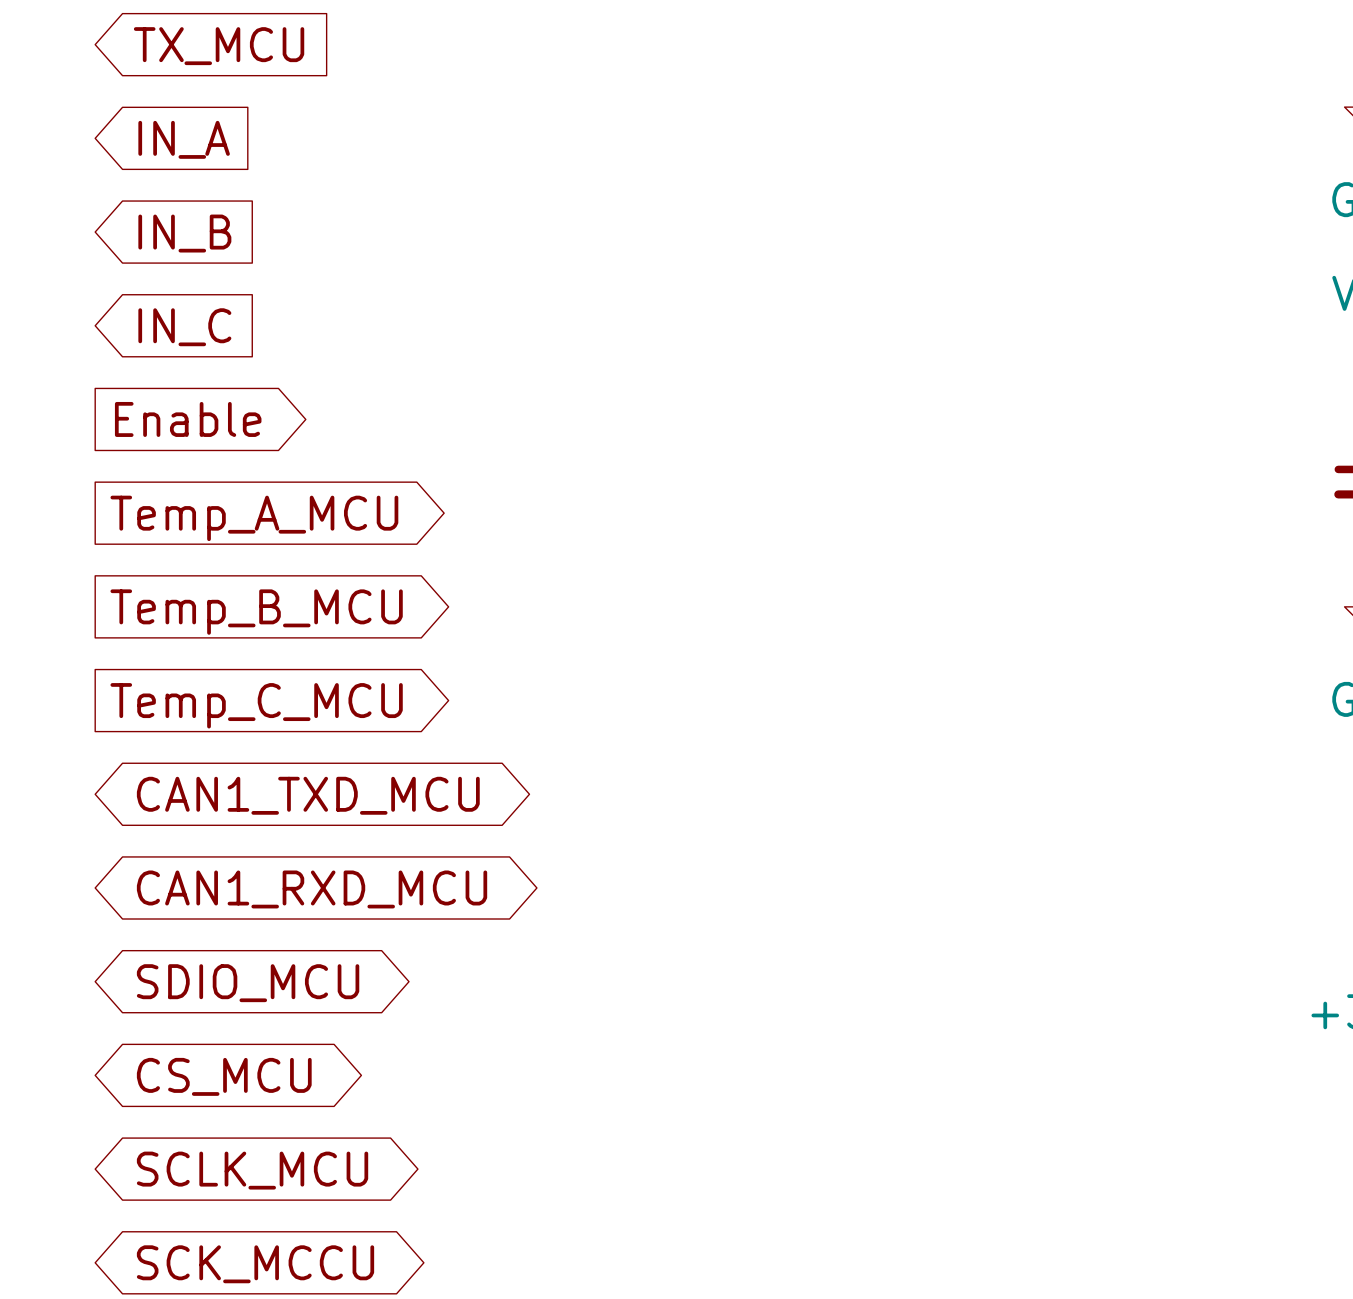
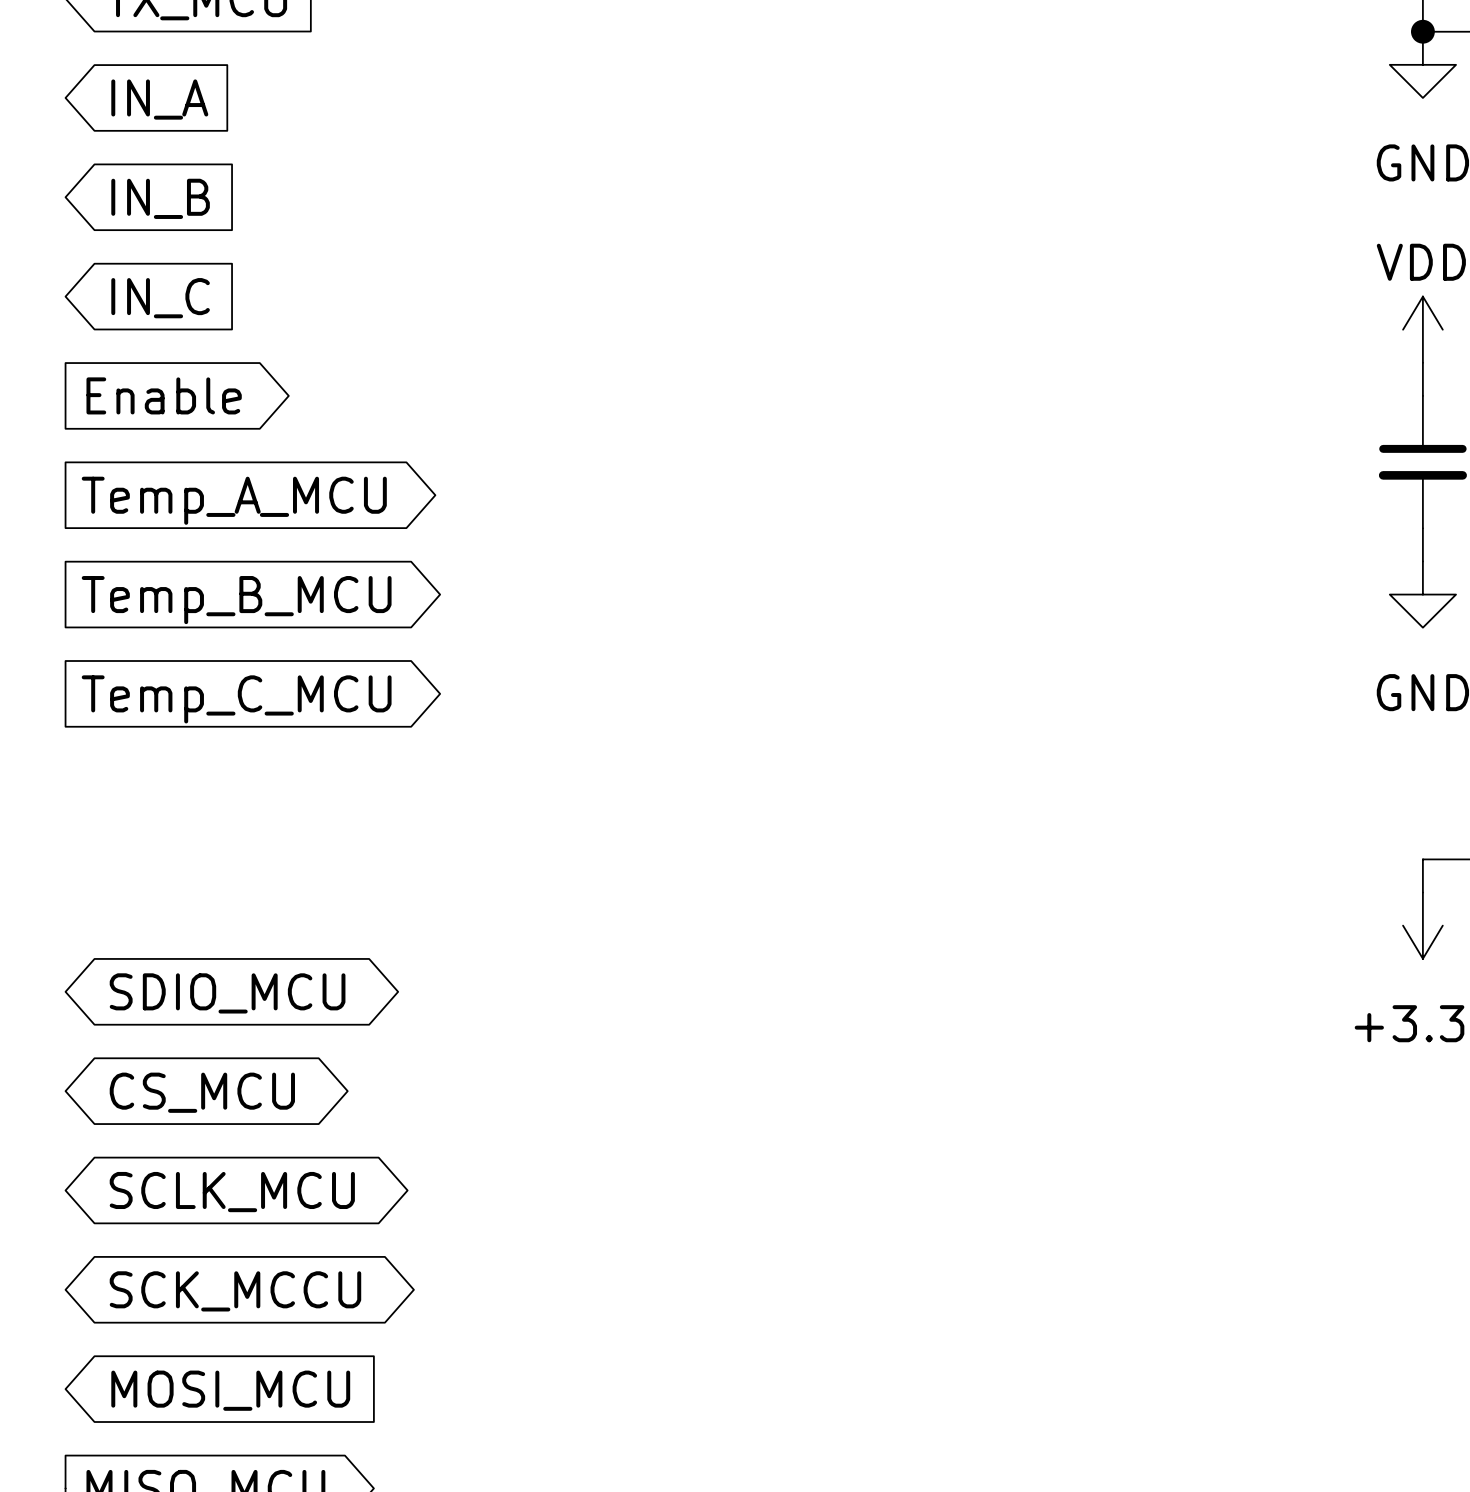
global label: CAN1_TXD_MCU (308, 795) -> none
global label: CAN1_RXD_MCU (312, 889) -> none

